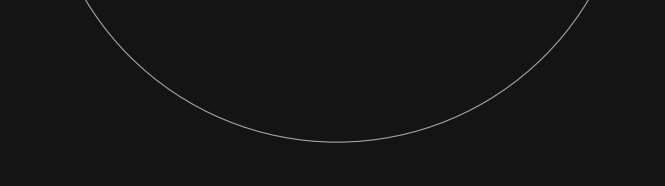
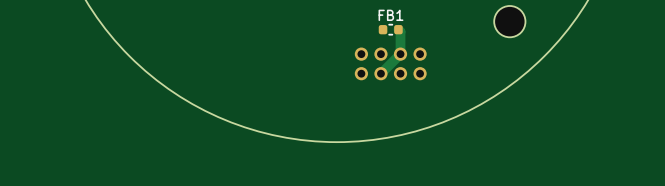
part: none -> (509, 21)
FB1: none -> (390, 29)
track: none -> (398, 29) (400, 31) (400, 54) (380, 73)
part: none -> (390, 63)

